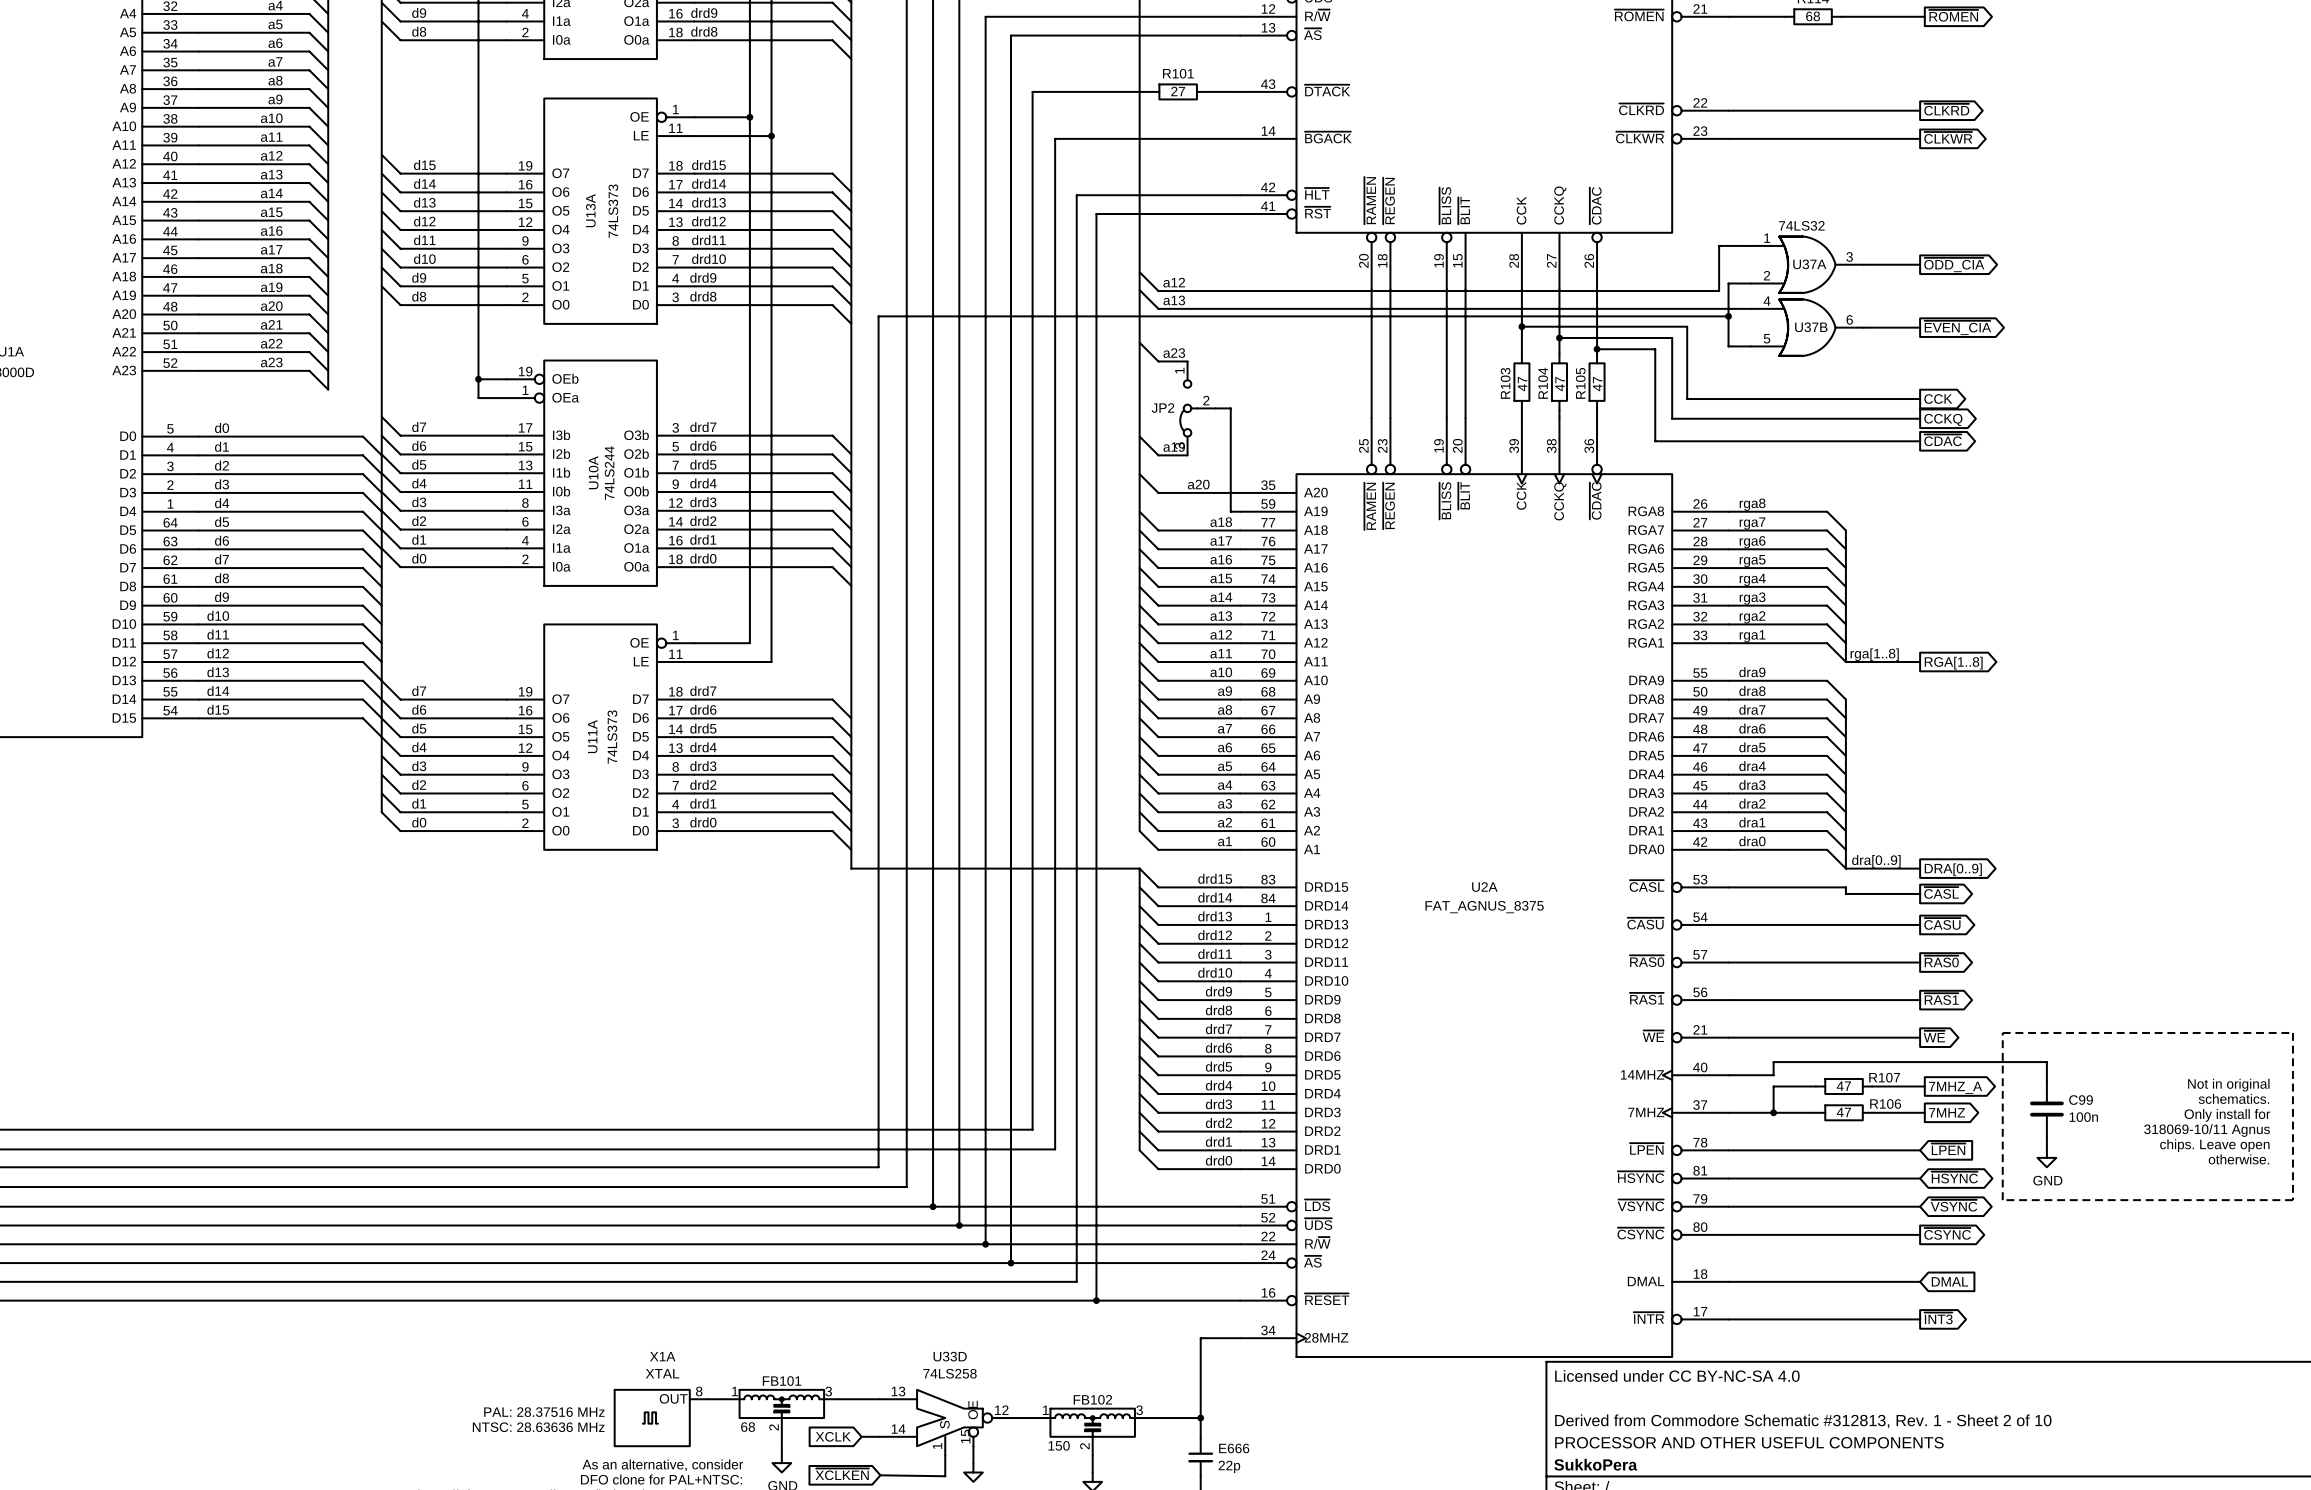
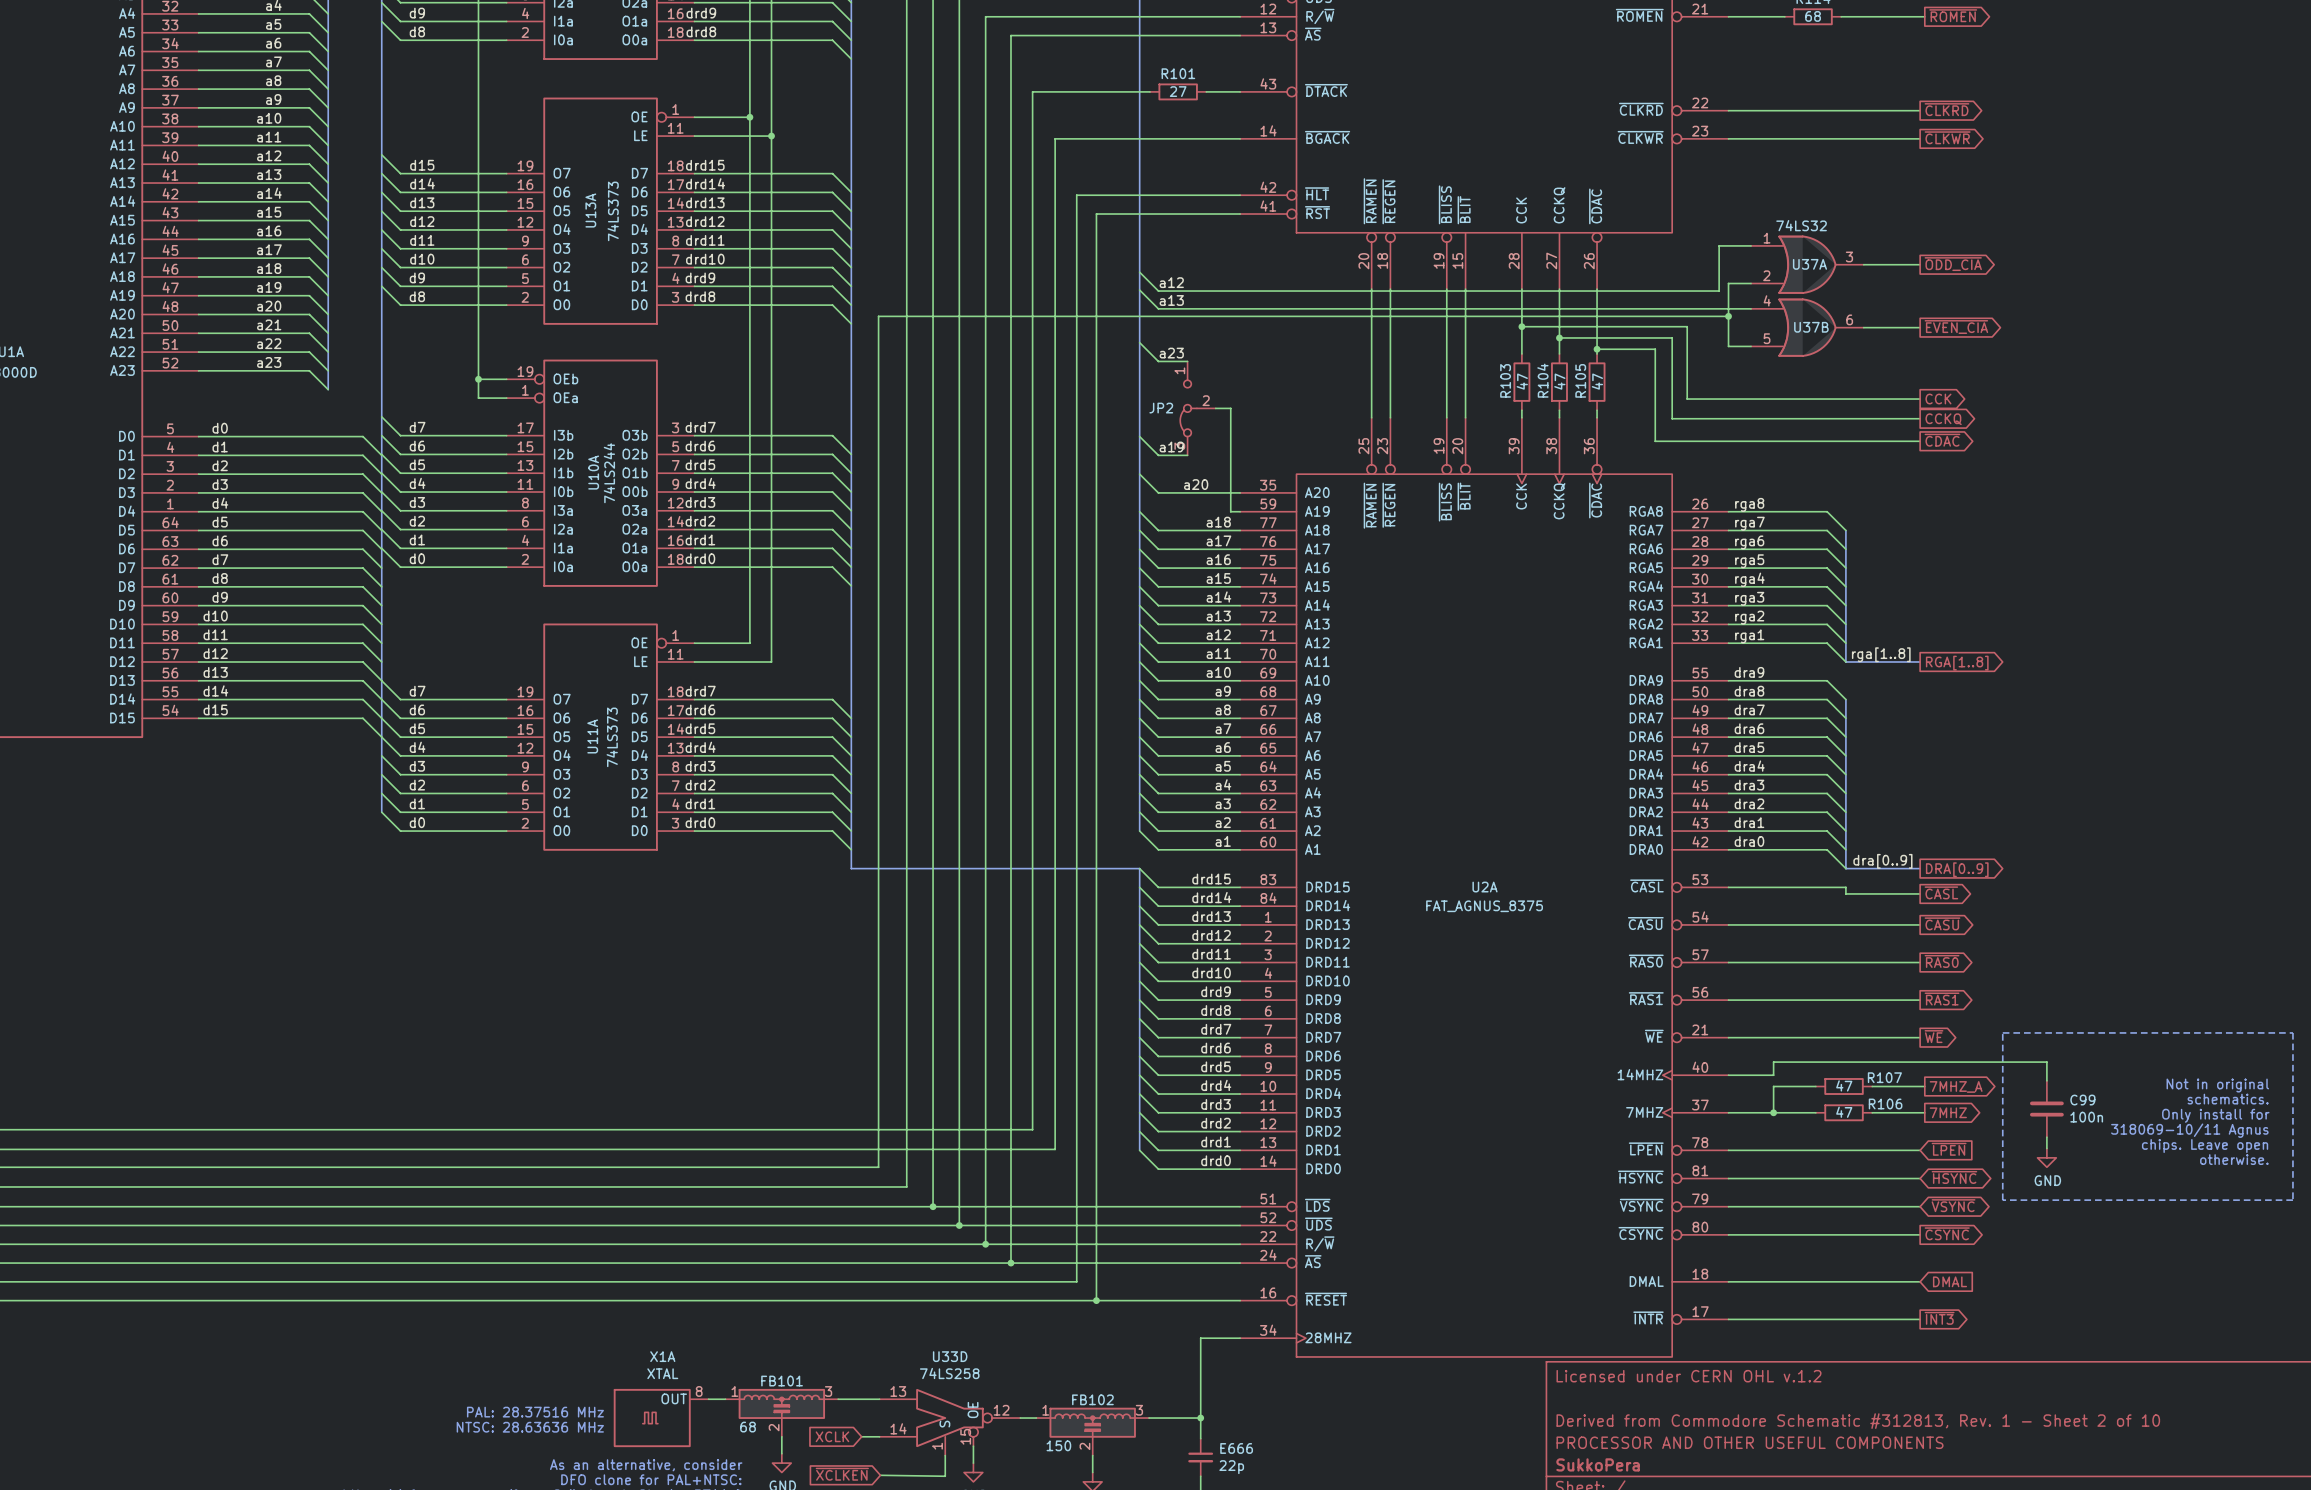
title block: Licensed under CC BY-NC-SA 4.0 (1677, 1375) -> Licensed under CERN OHL v.1.2 (1689, 1376)

